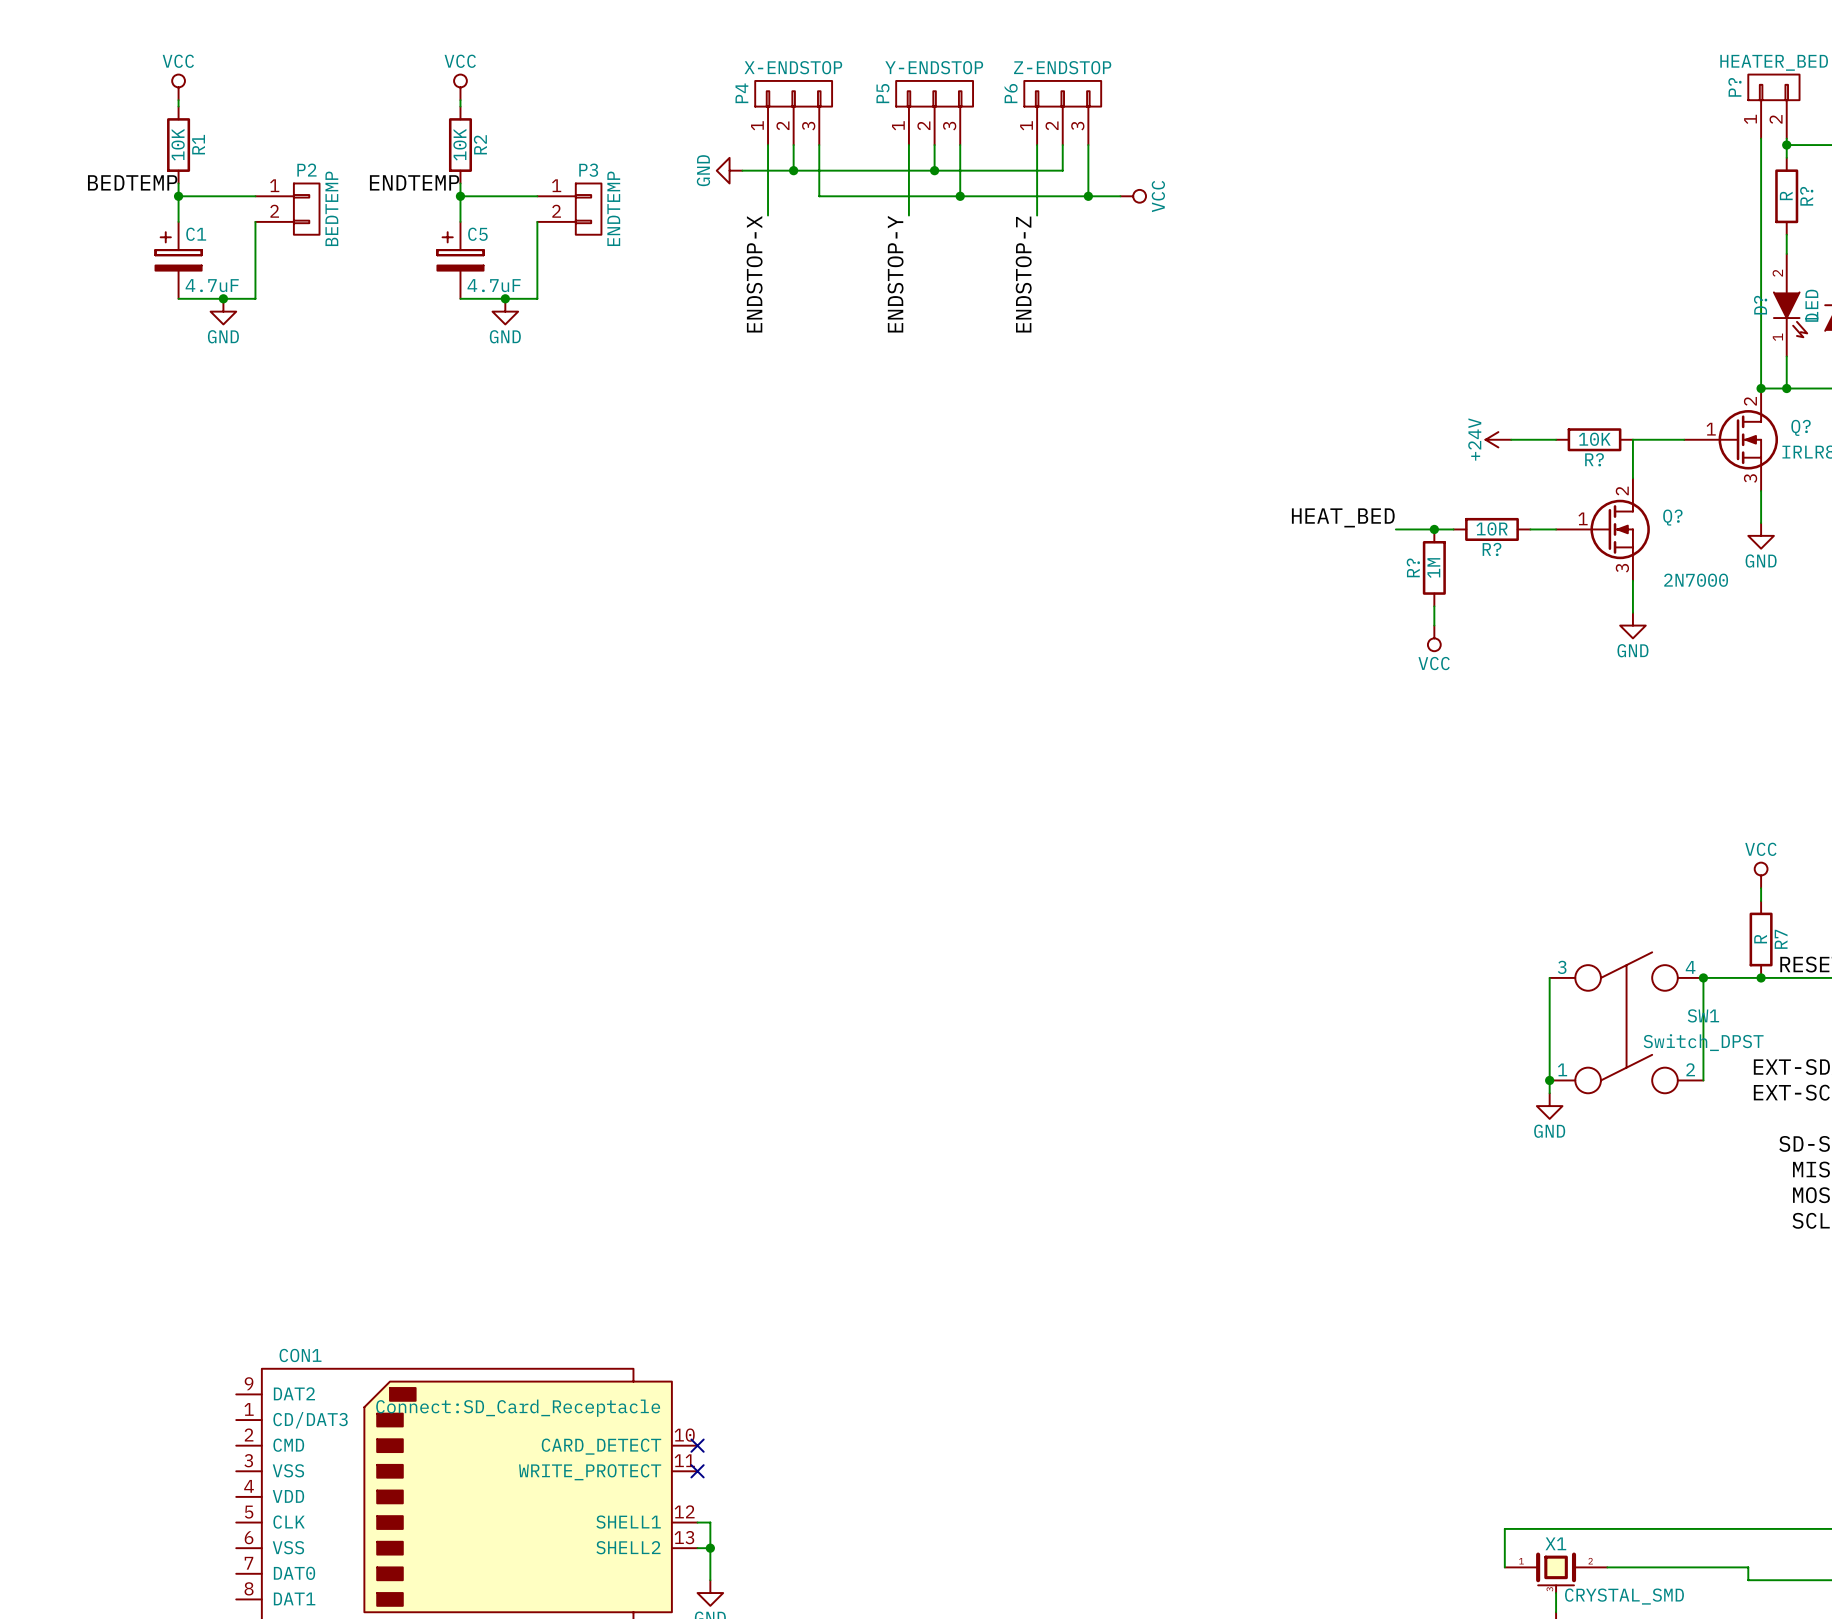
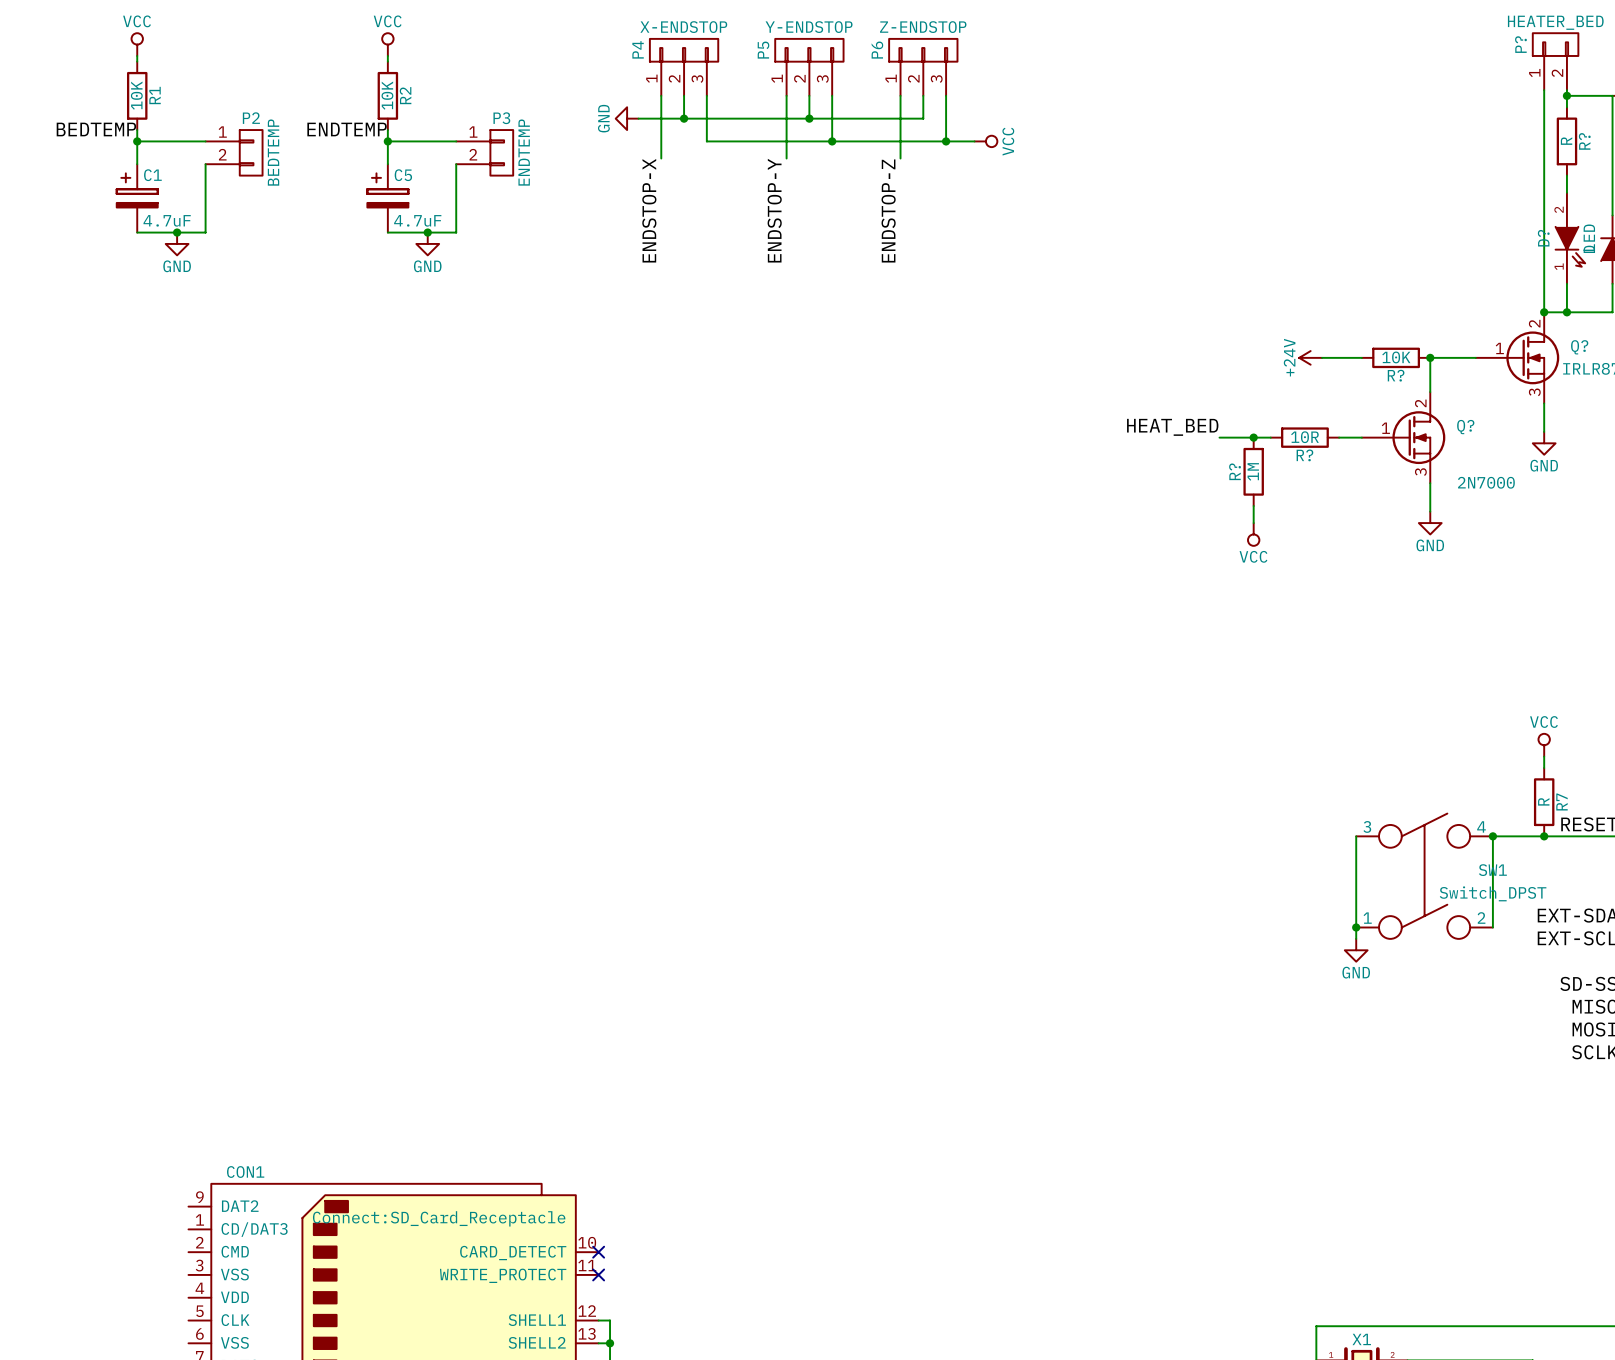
junction: none -> (1430, 357)

